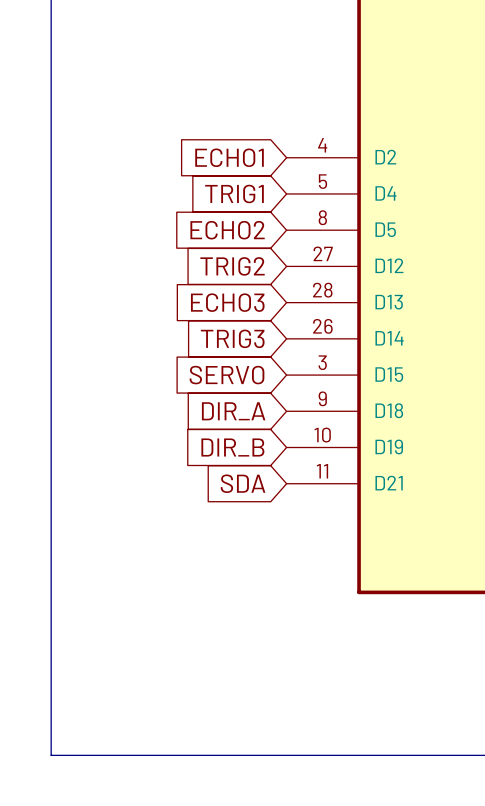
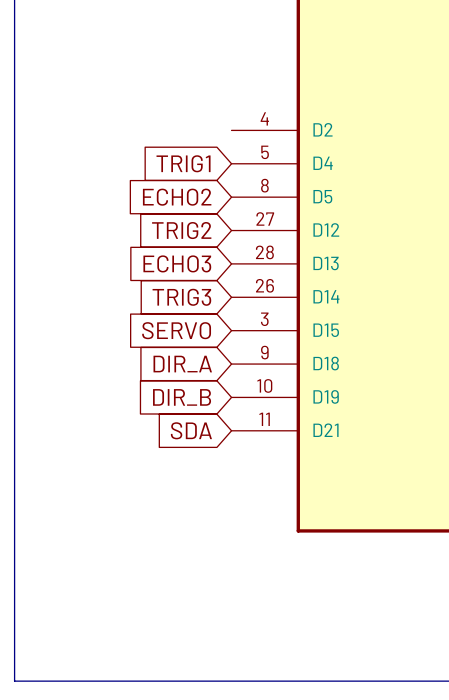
global label: ECHO1 (229, 157) -> none

